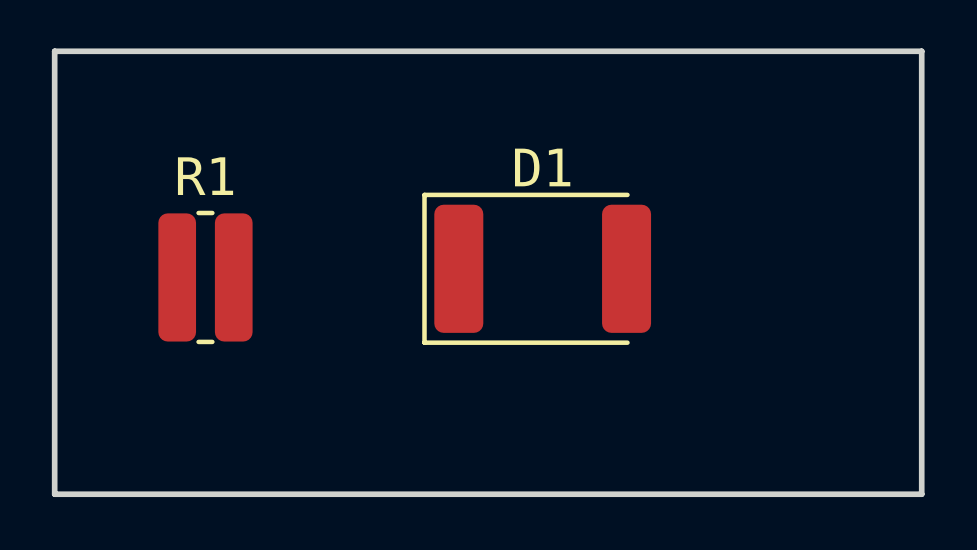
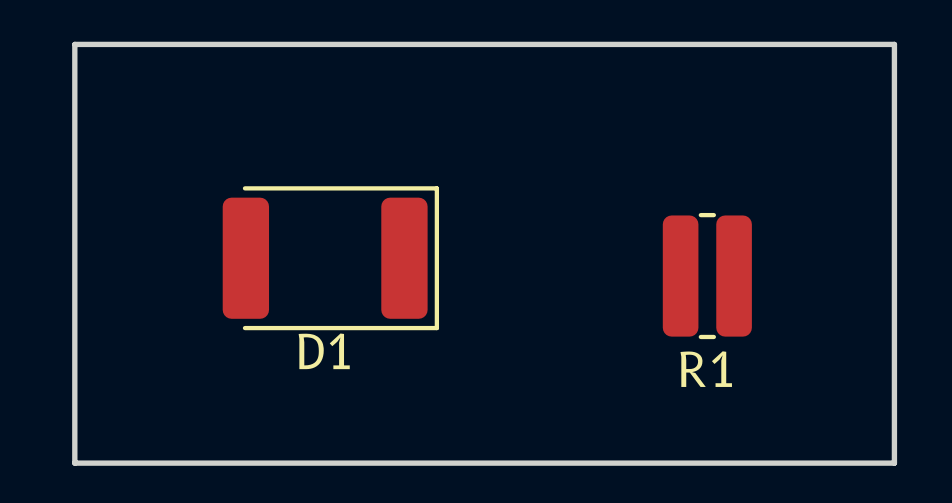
R1 name position: R1 (205, 176) -> R1 (706, 369)
D1 rotation: 0° (536, 268) -> 180° (330, 258)
D1 position: (536, 268) -> (330, 258)
R1 position: (205, 277) -> (707, 276)

